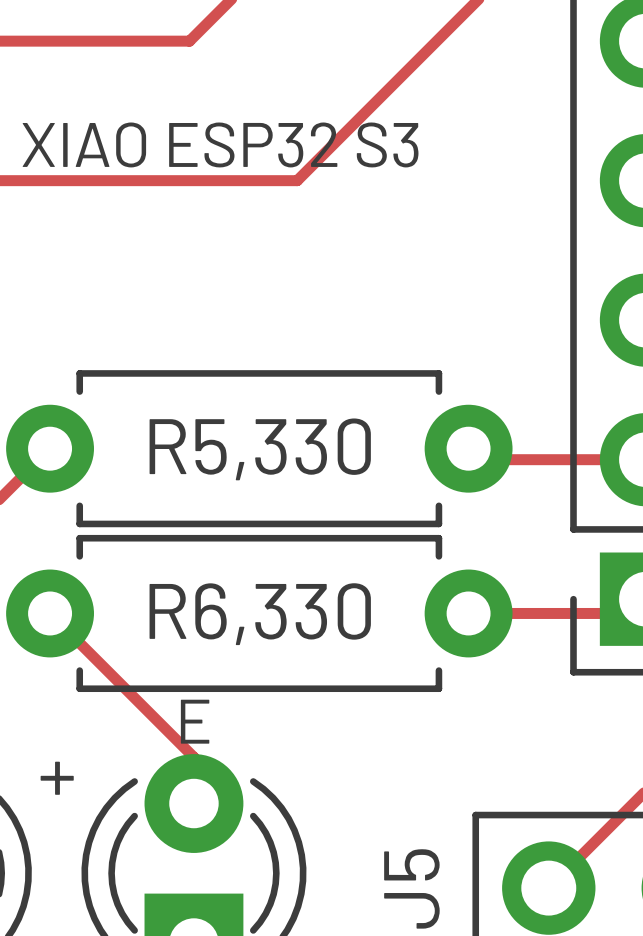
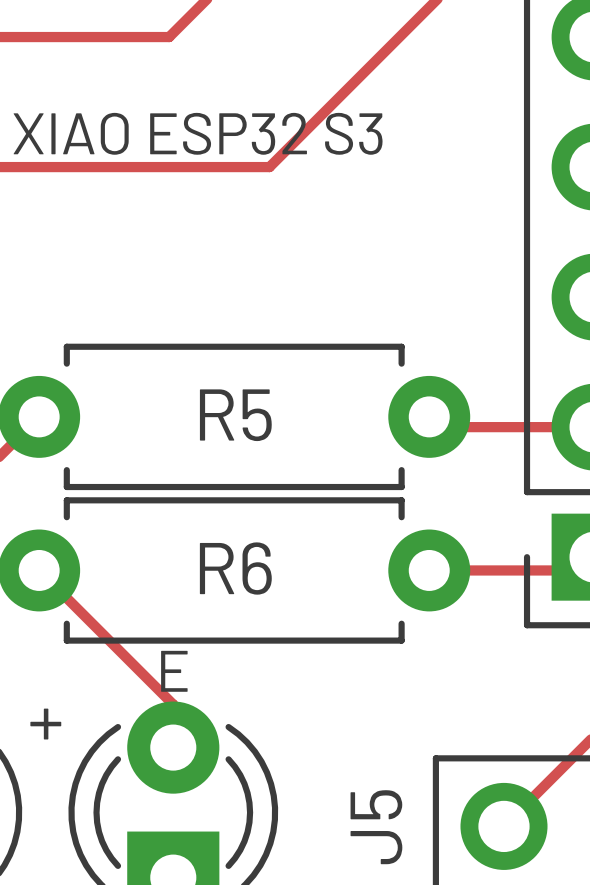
R5,330 name: R5,330 (260, 449) -> R5 (235, 415)
R6,330 name: R6,330 (260, 614) -> R6 (235, 568)

